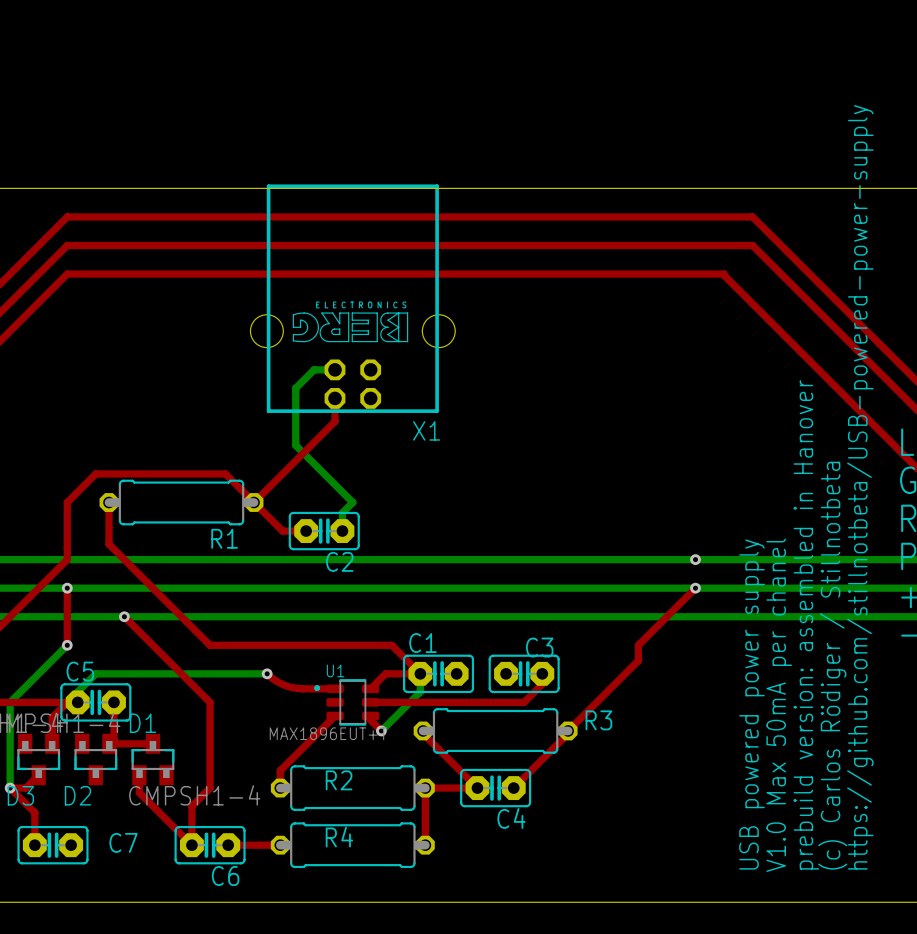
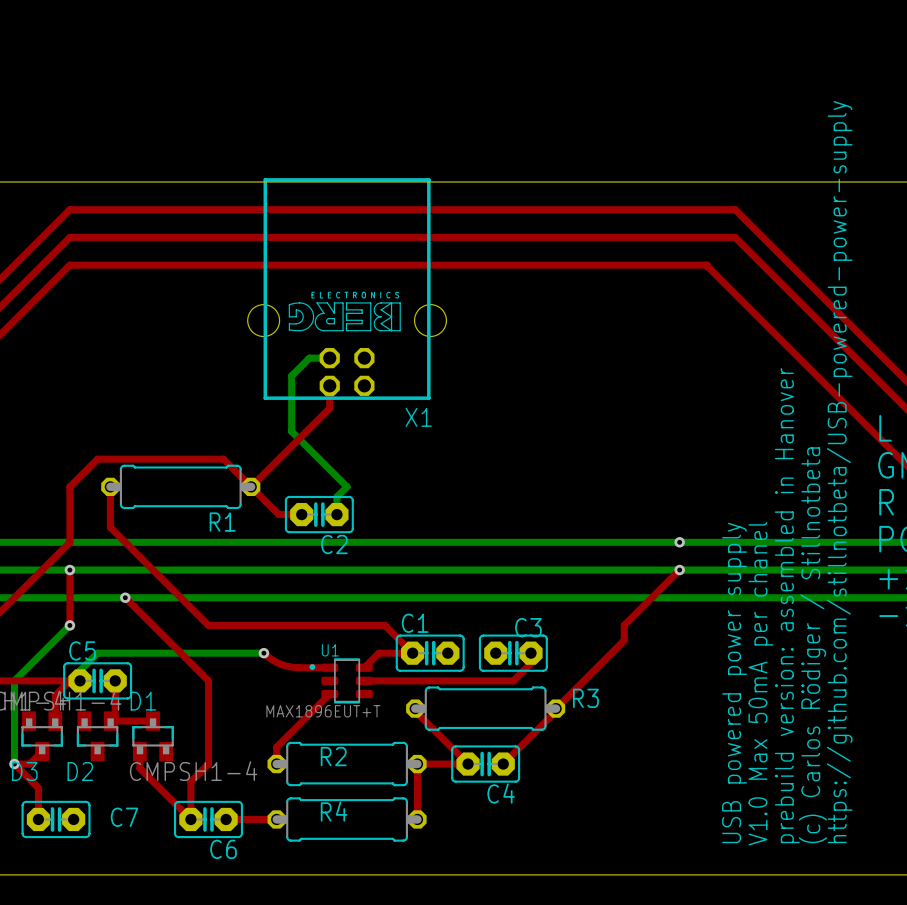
bottom track: (420, 673) (420, 691) (381, 730) -> none
top track: (370, 715) (370, 720) (381, 730) -> none
via: (381, 730) -> none

